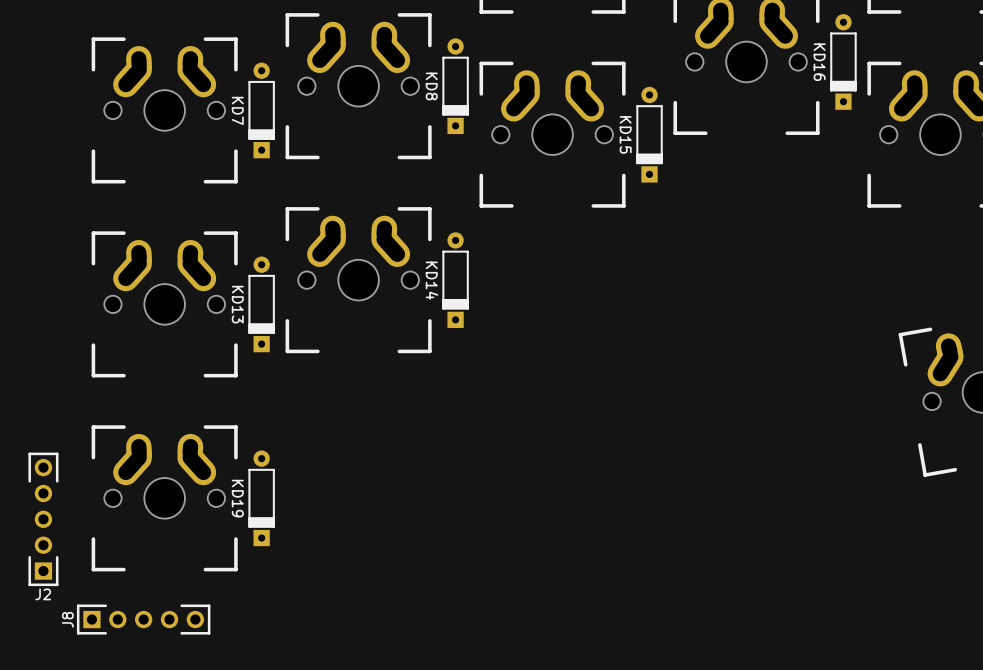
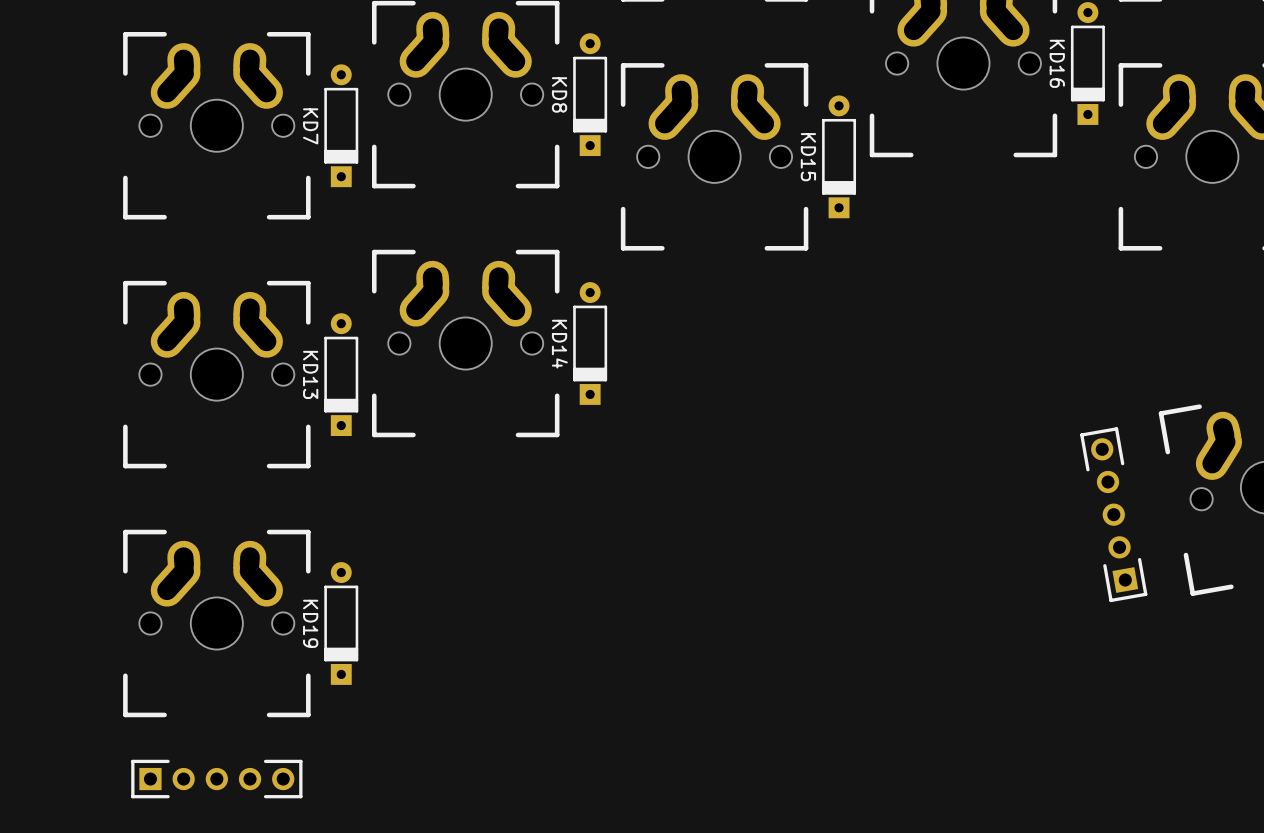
part: none -> (1113, 514)
J2: (43, 519) -> none
J8: (143, 619) -> none
part: none -> (216, 779)

